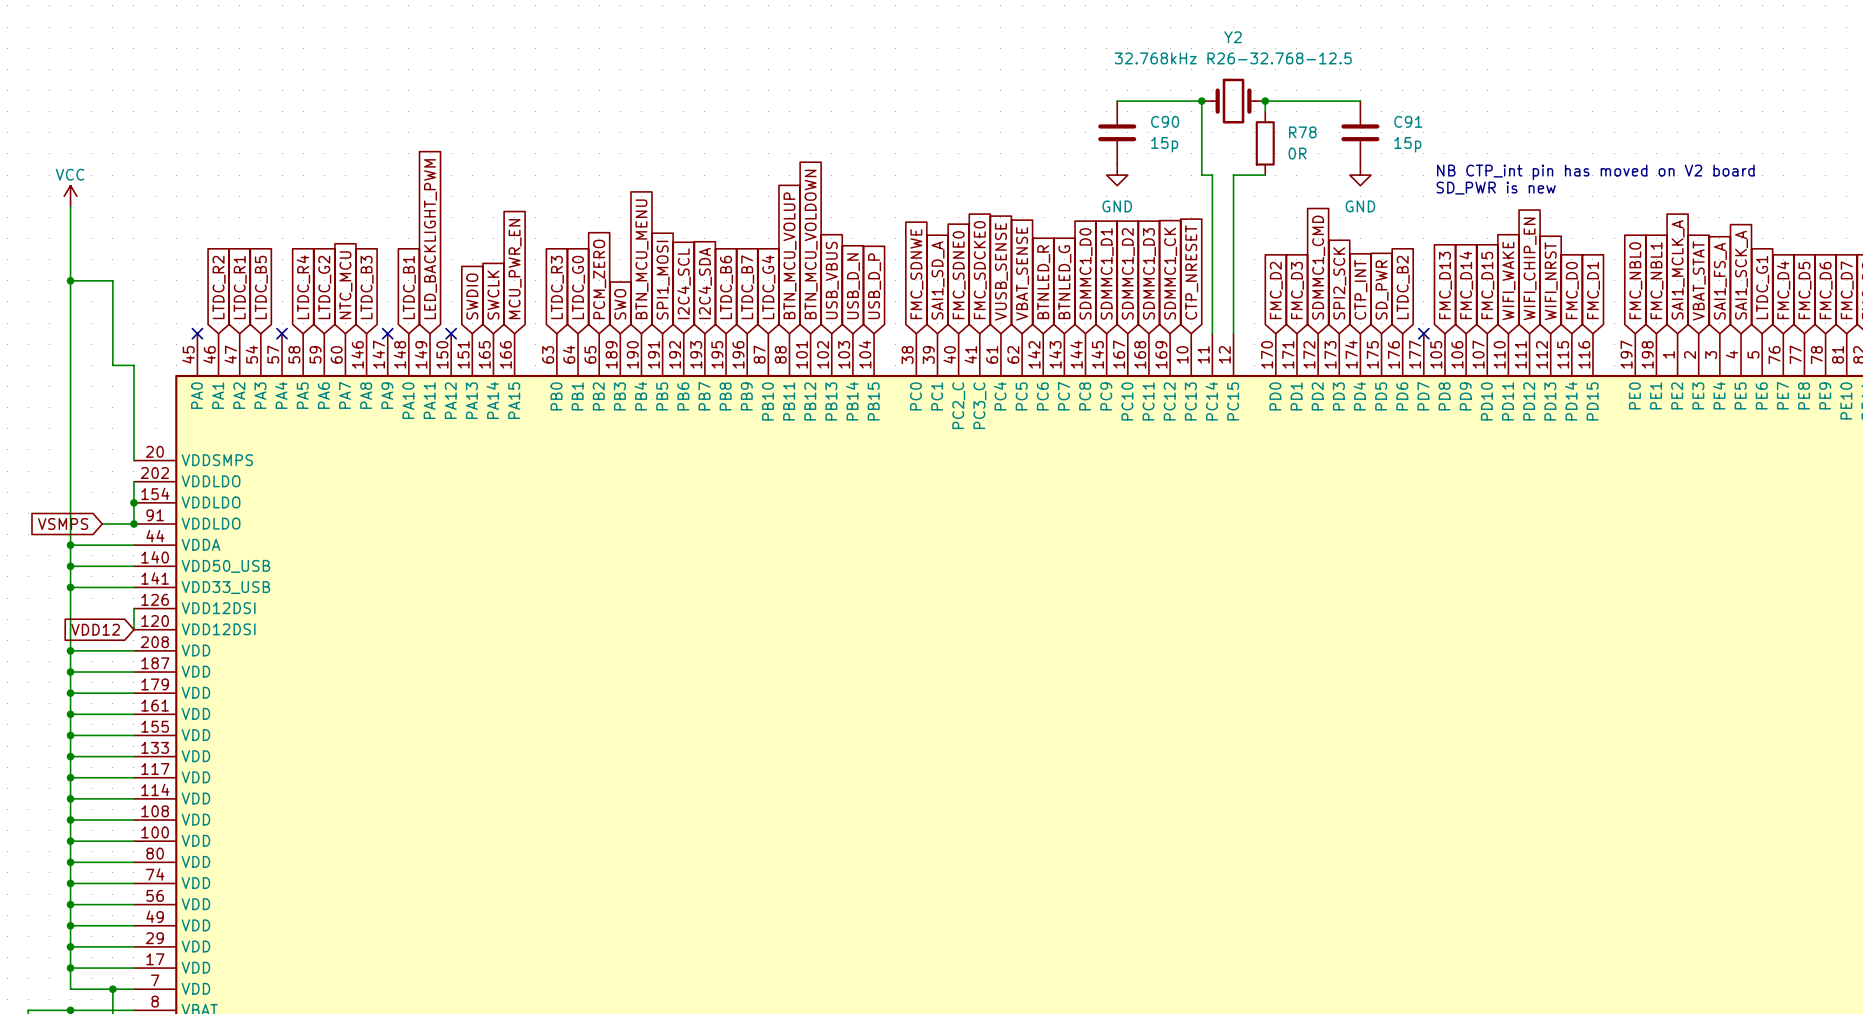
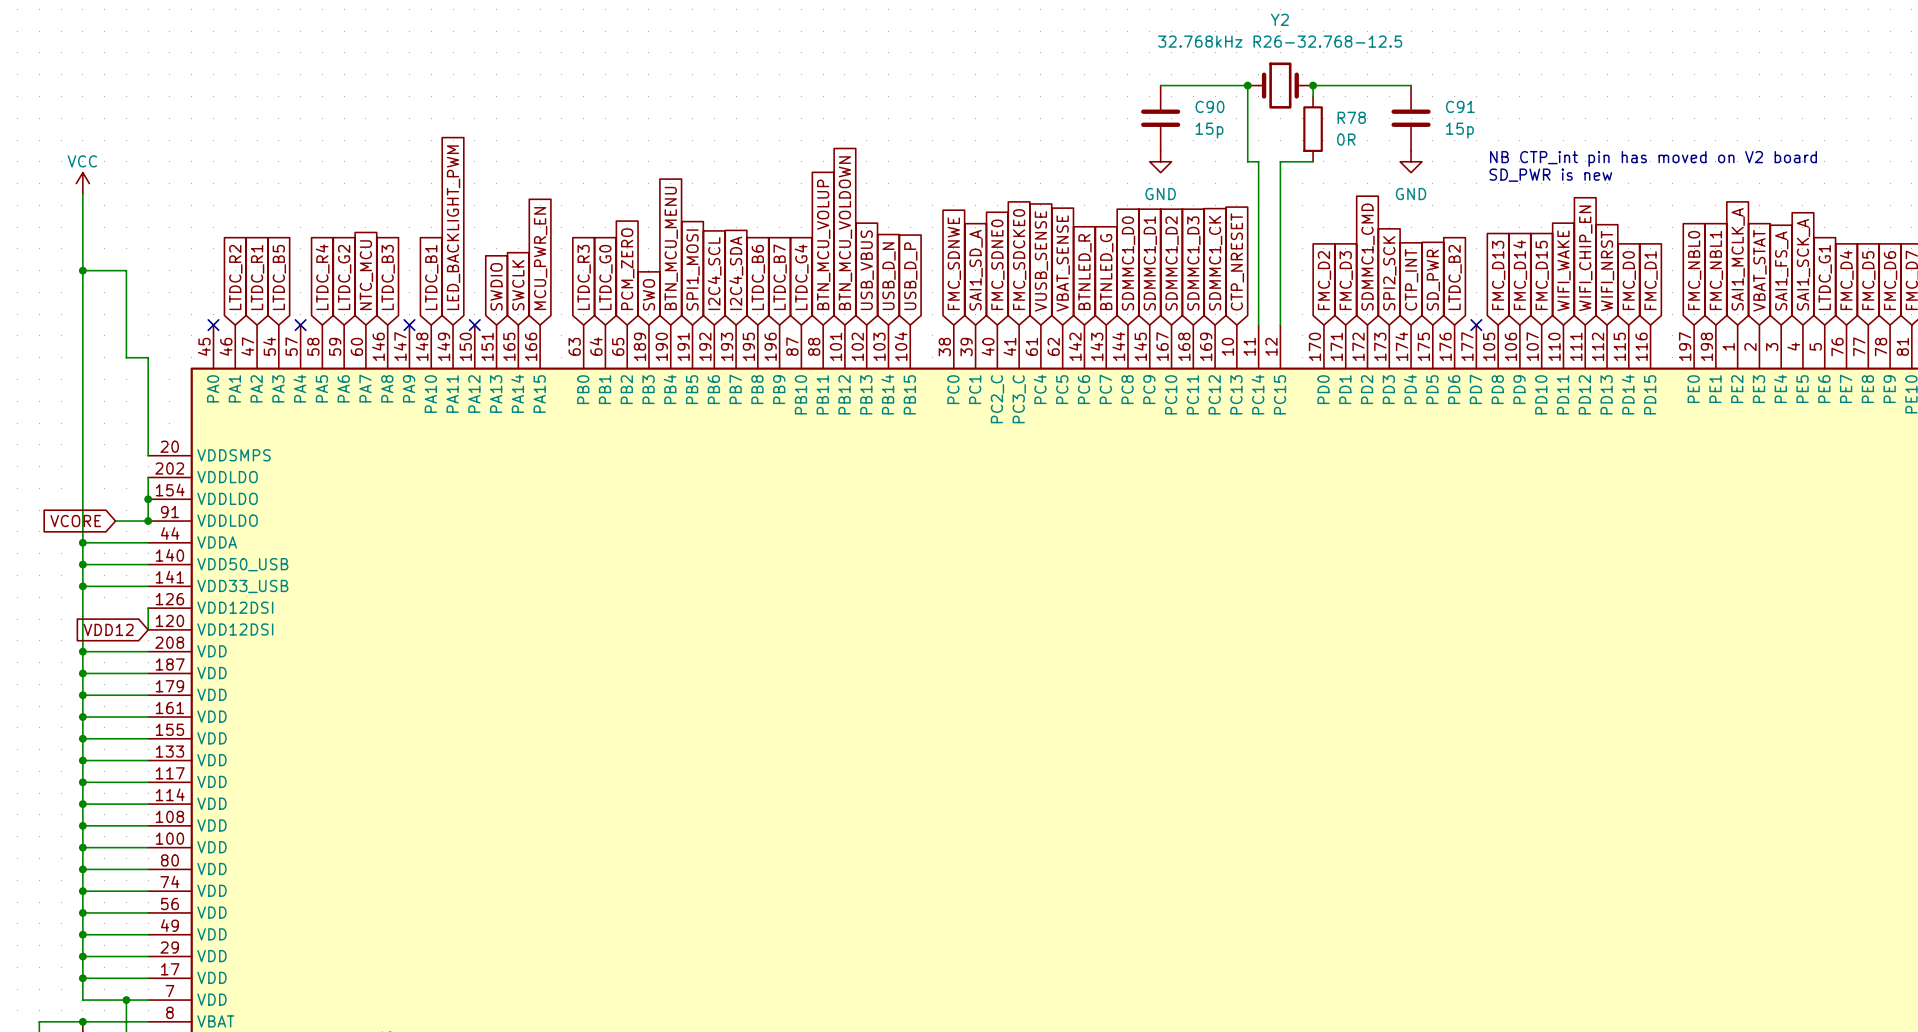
global label: VSMPS (63, 524) -> VCORE (75, 521)

